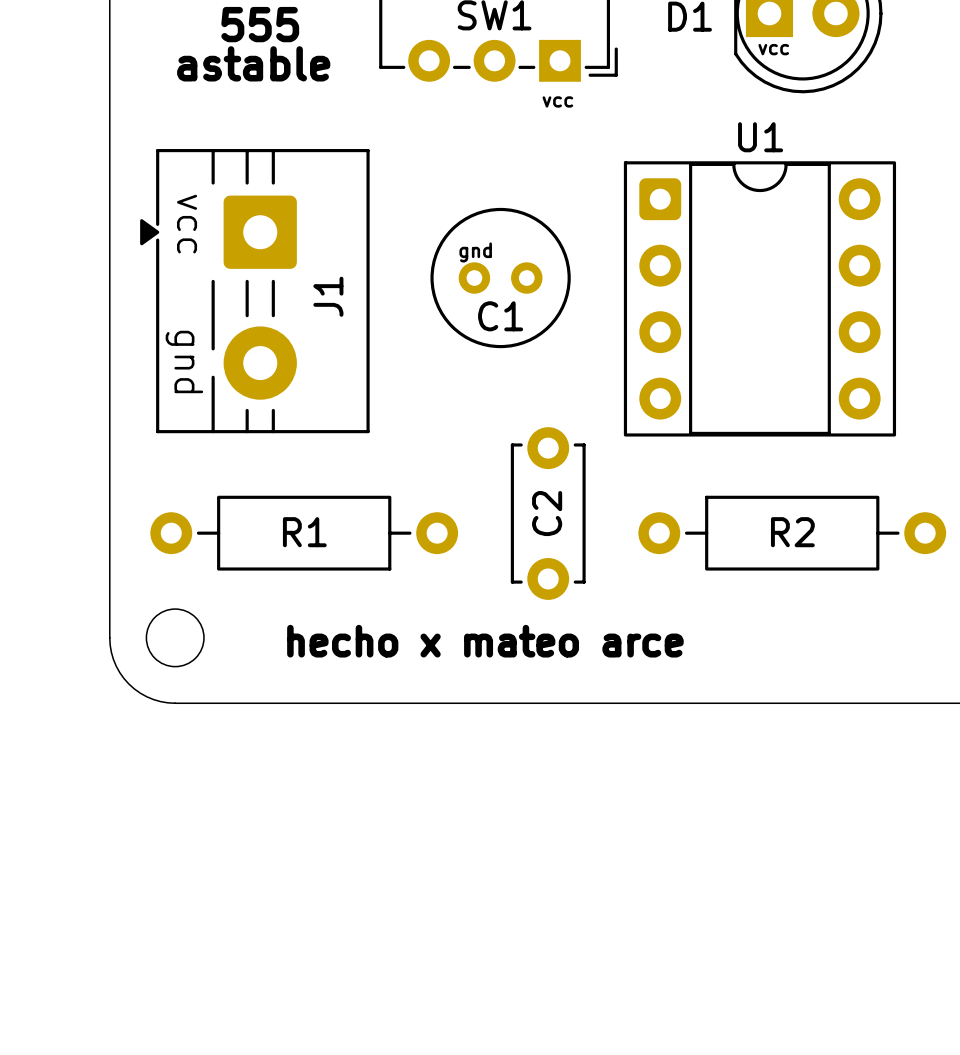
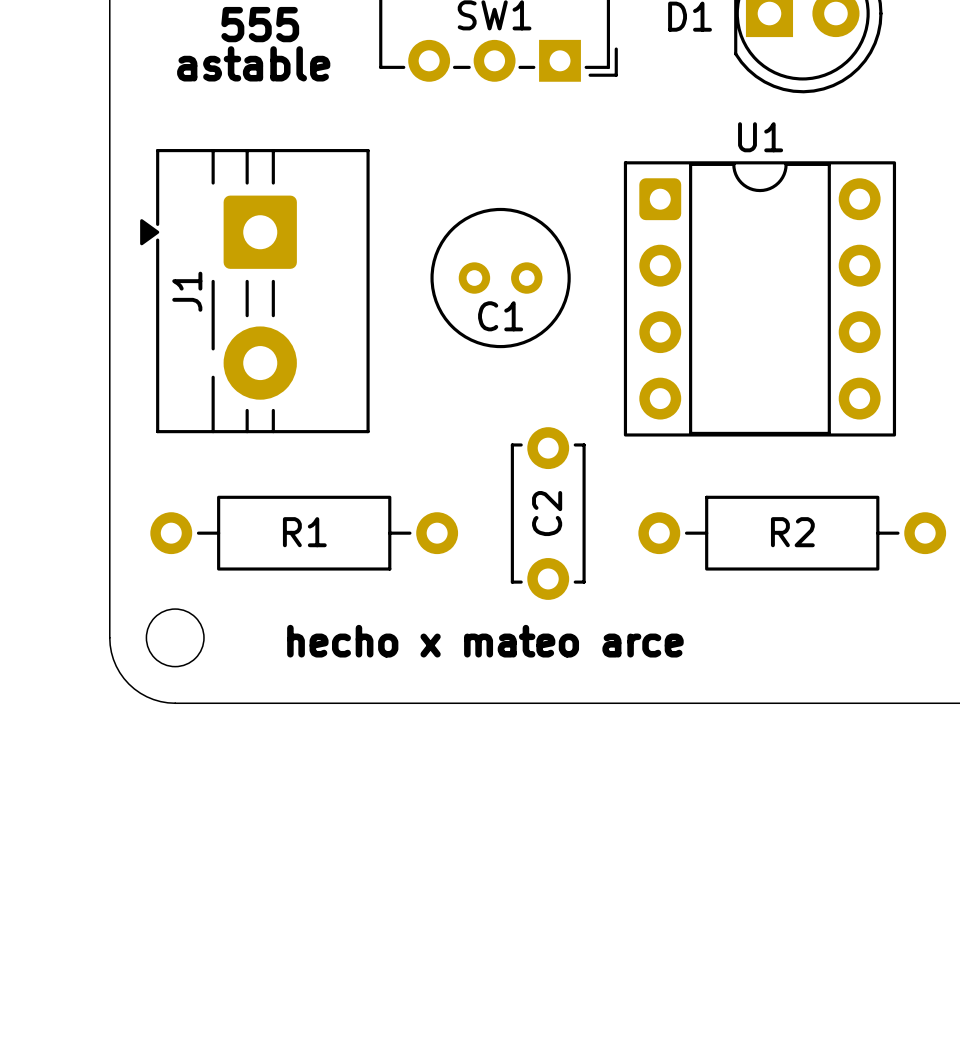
text: vcc (773, 49) -> none
text: vcc (557, 101) -> none
text: vcc (187, 224) -> none
text: gnd (475, 252) -> none
J1 name position: J1 (328, 296) -> J1 (187, 291)
text: gnd (184, 361) -> none

